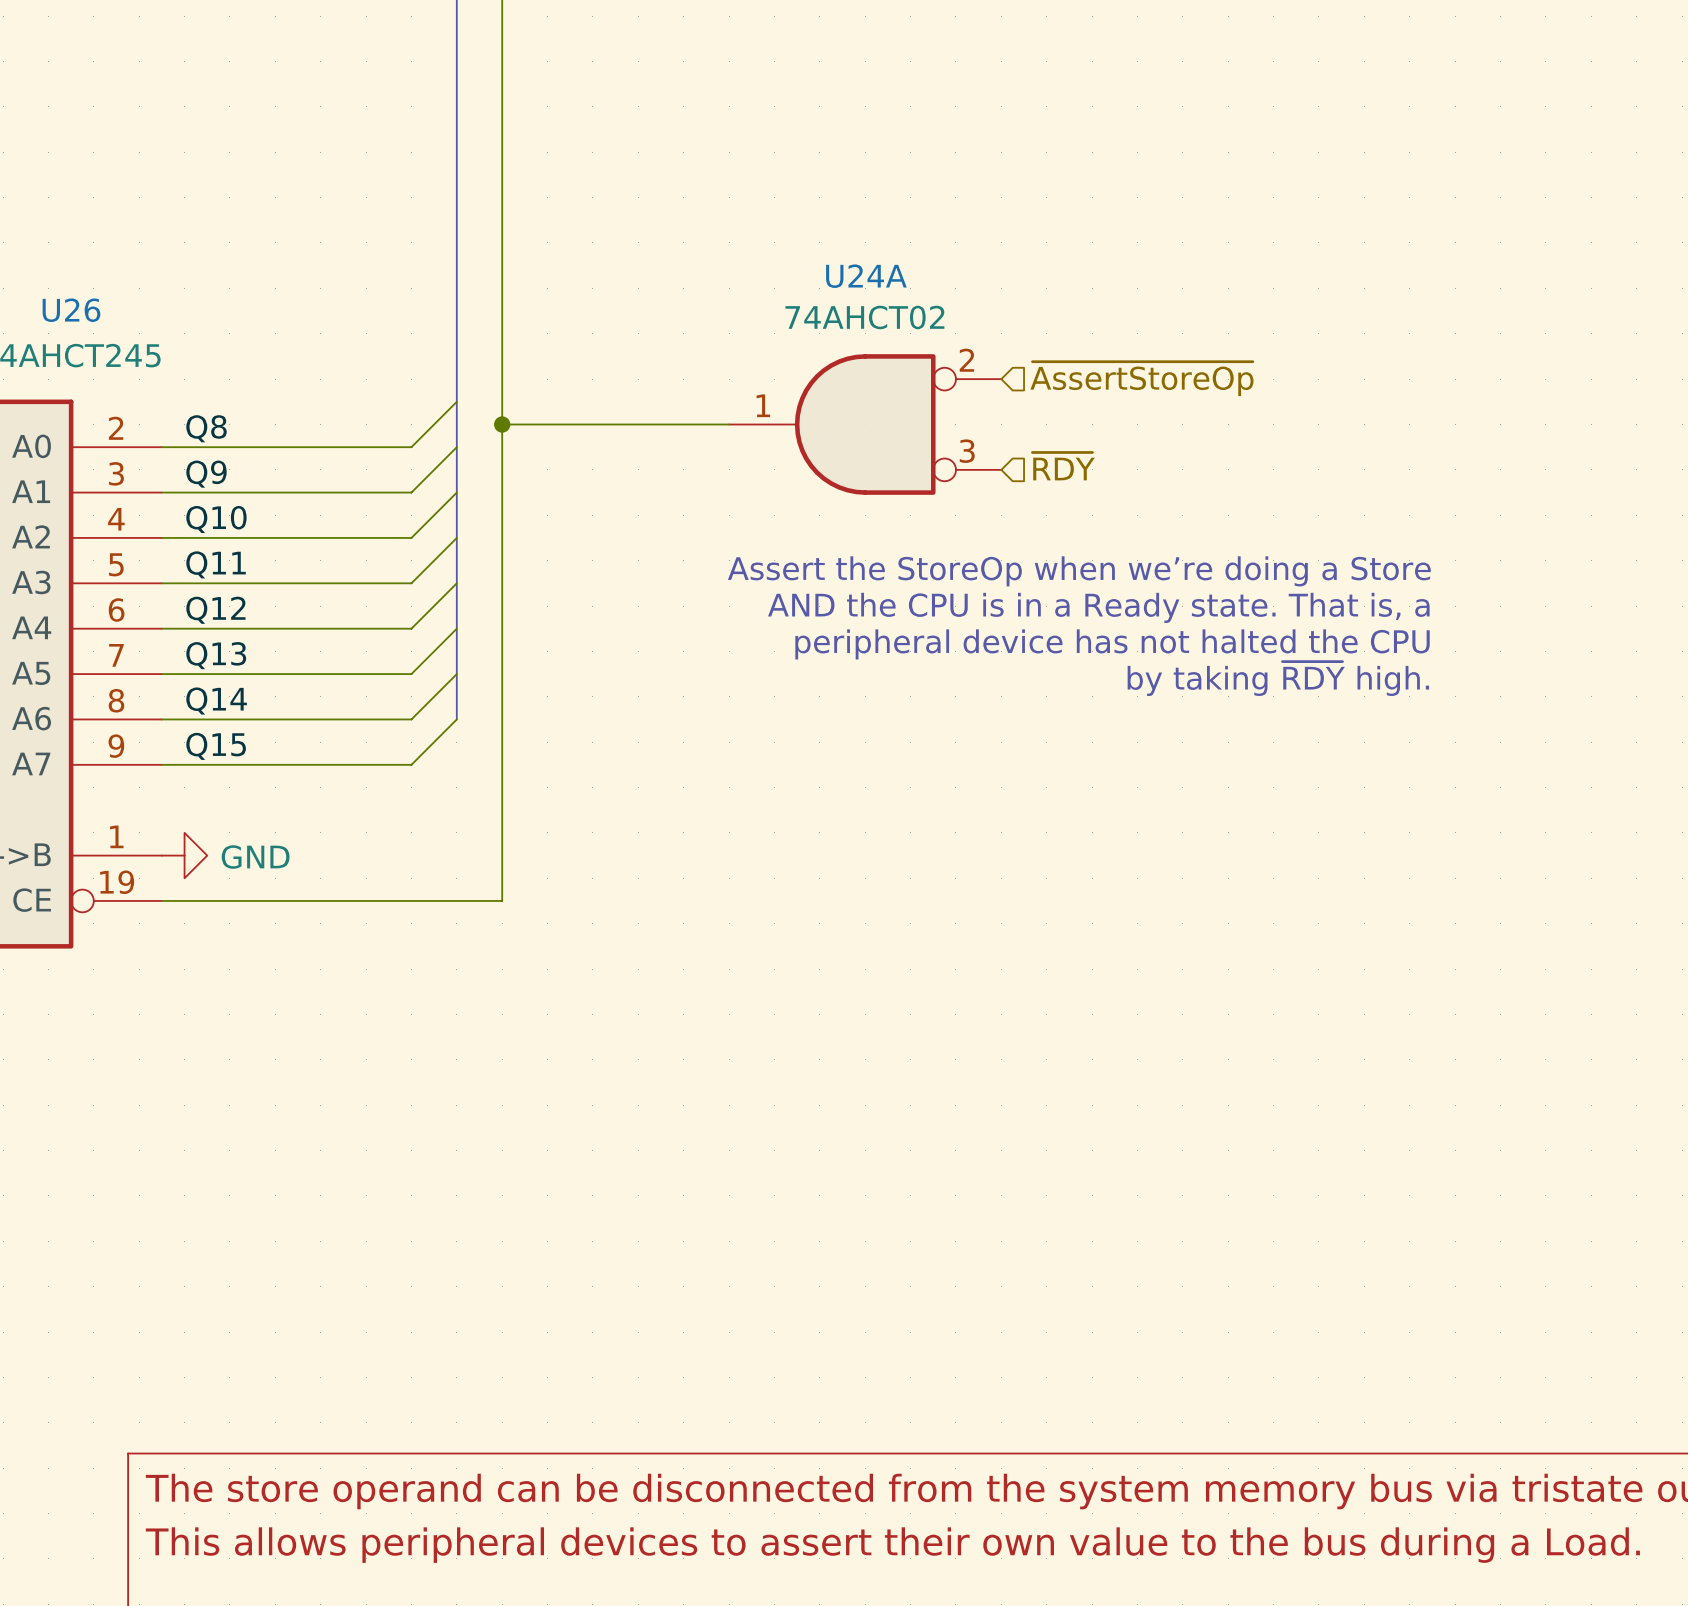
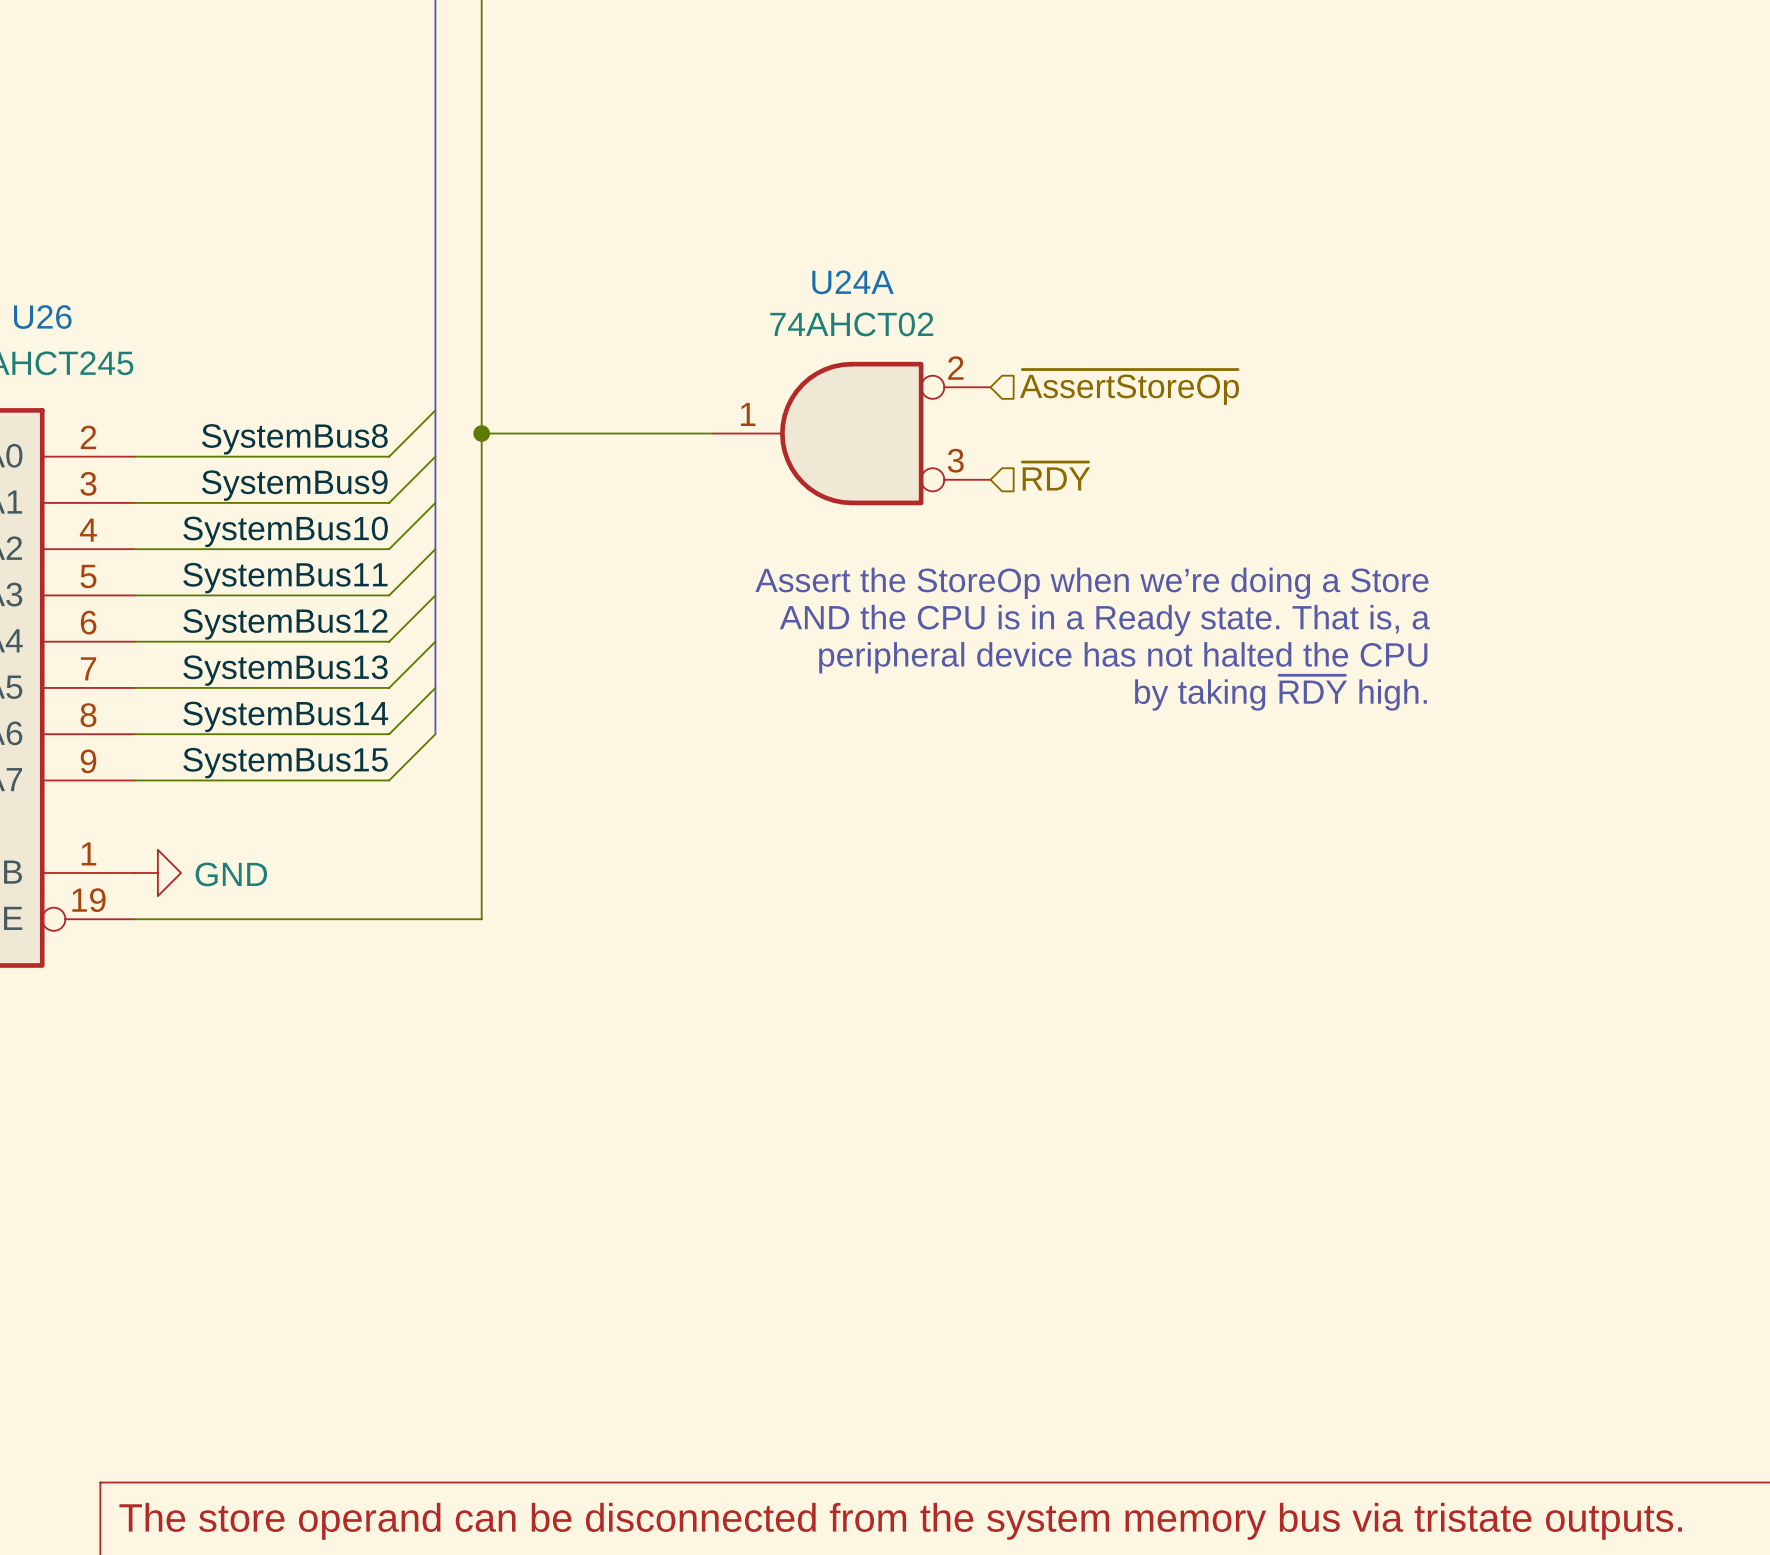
label: Q8 (206, 428) -> none
label: none -> SystemBus8 (294, 439)
label: Q9 (206, 474) -> none
label: none -> SystemBus9 (294, 485)
label: Q10 (216, 519) -> none
label: none -> SystemBus10 (285, 531)
label: Q11 (216, 564) -> none
label: none -> SystemBus11 (285, 578)
label: Q12 (215, 610) -> none
label: none -> SystemBus12 (285, 624)
label: Q13 (216, 655) -> none
label: none -> SystemBus13 (285, 670)
label: Q14 (216, 701) -> none
label: none -> SystemBus14 (285, 716)
label: Q15 (216, 746) -> none
label: none -> SystemBus15 (285, 763)

